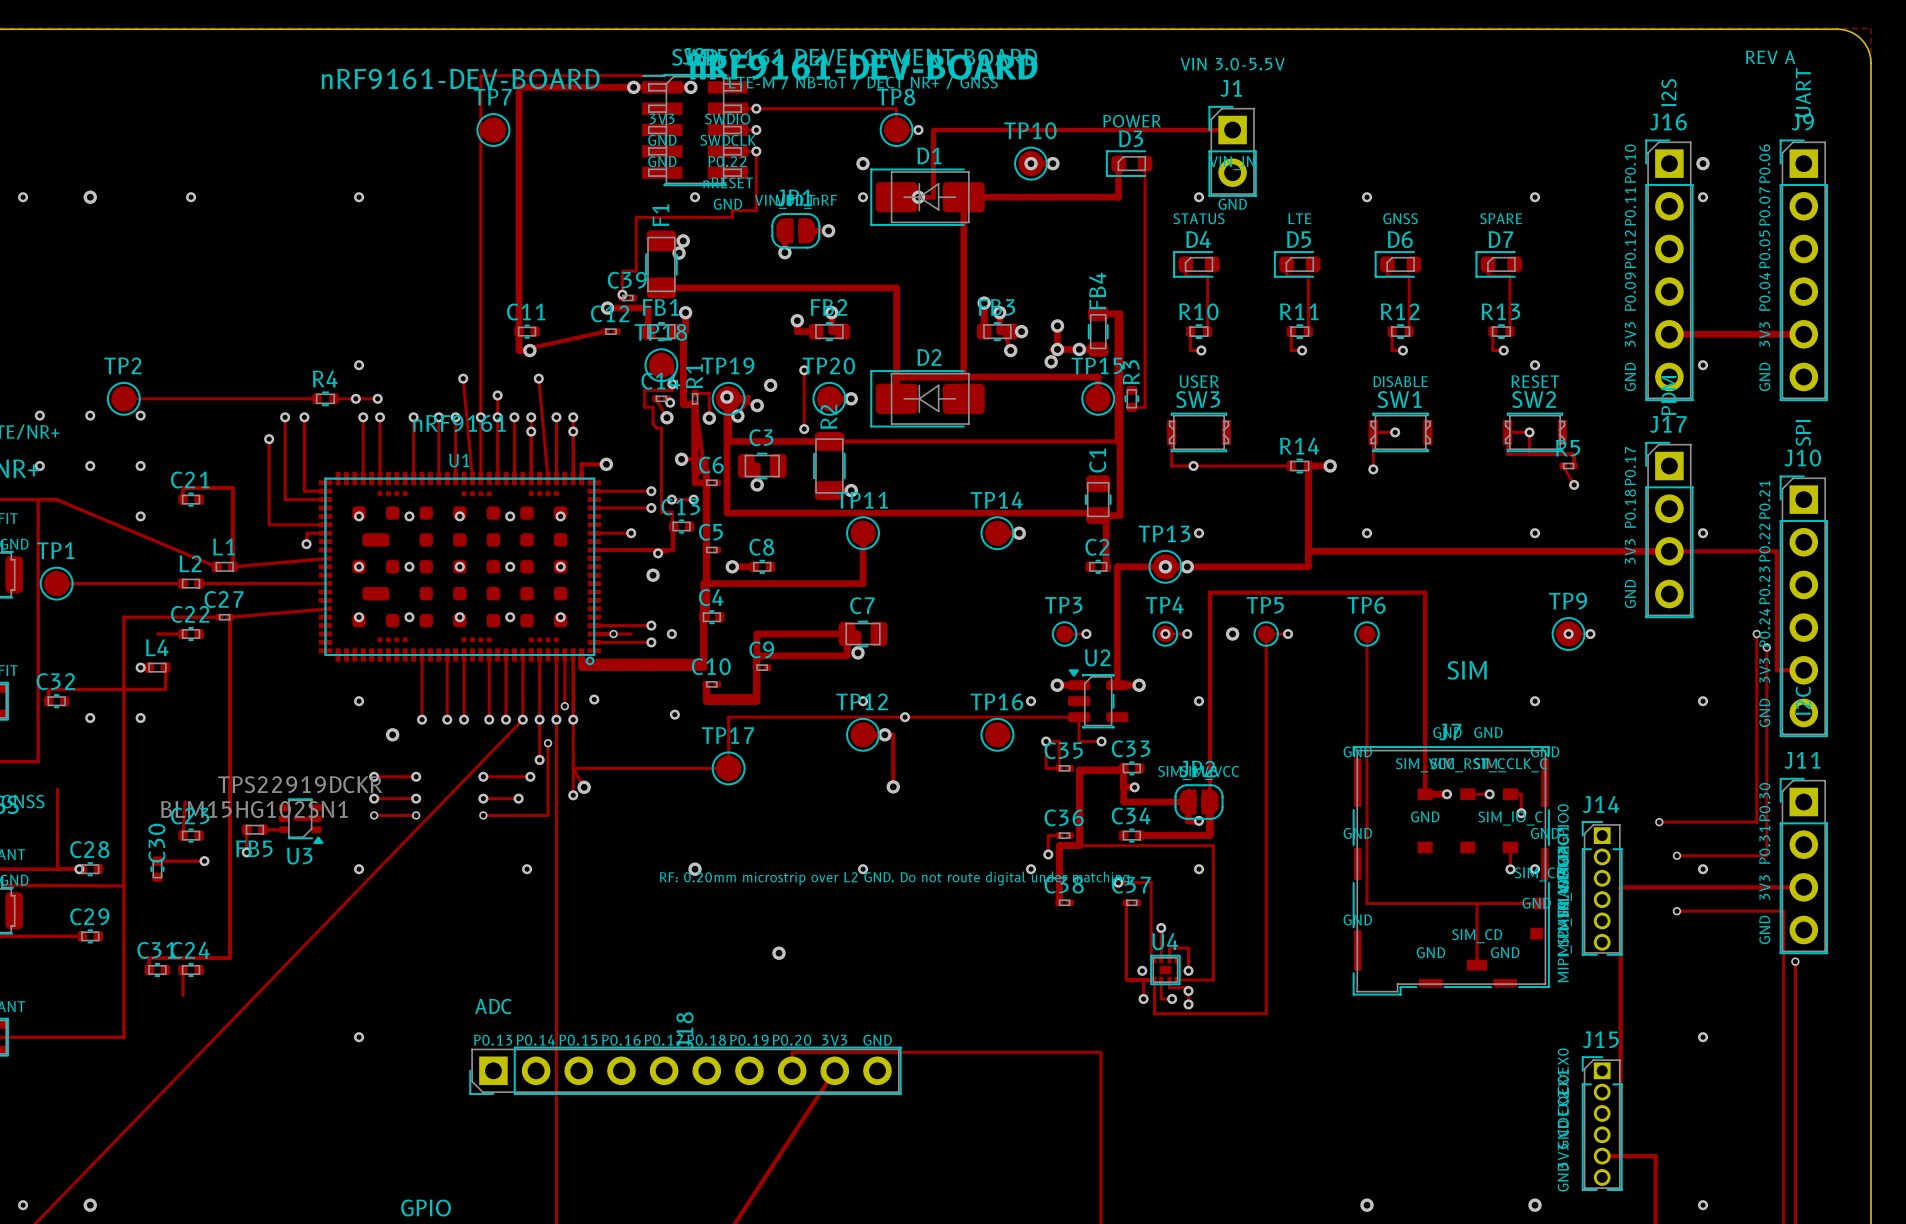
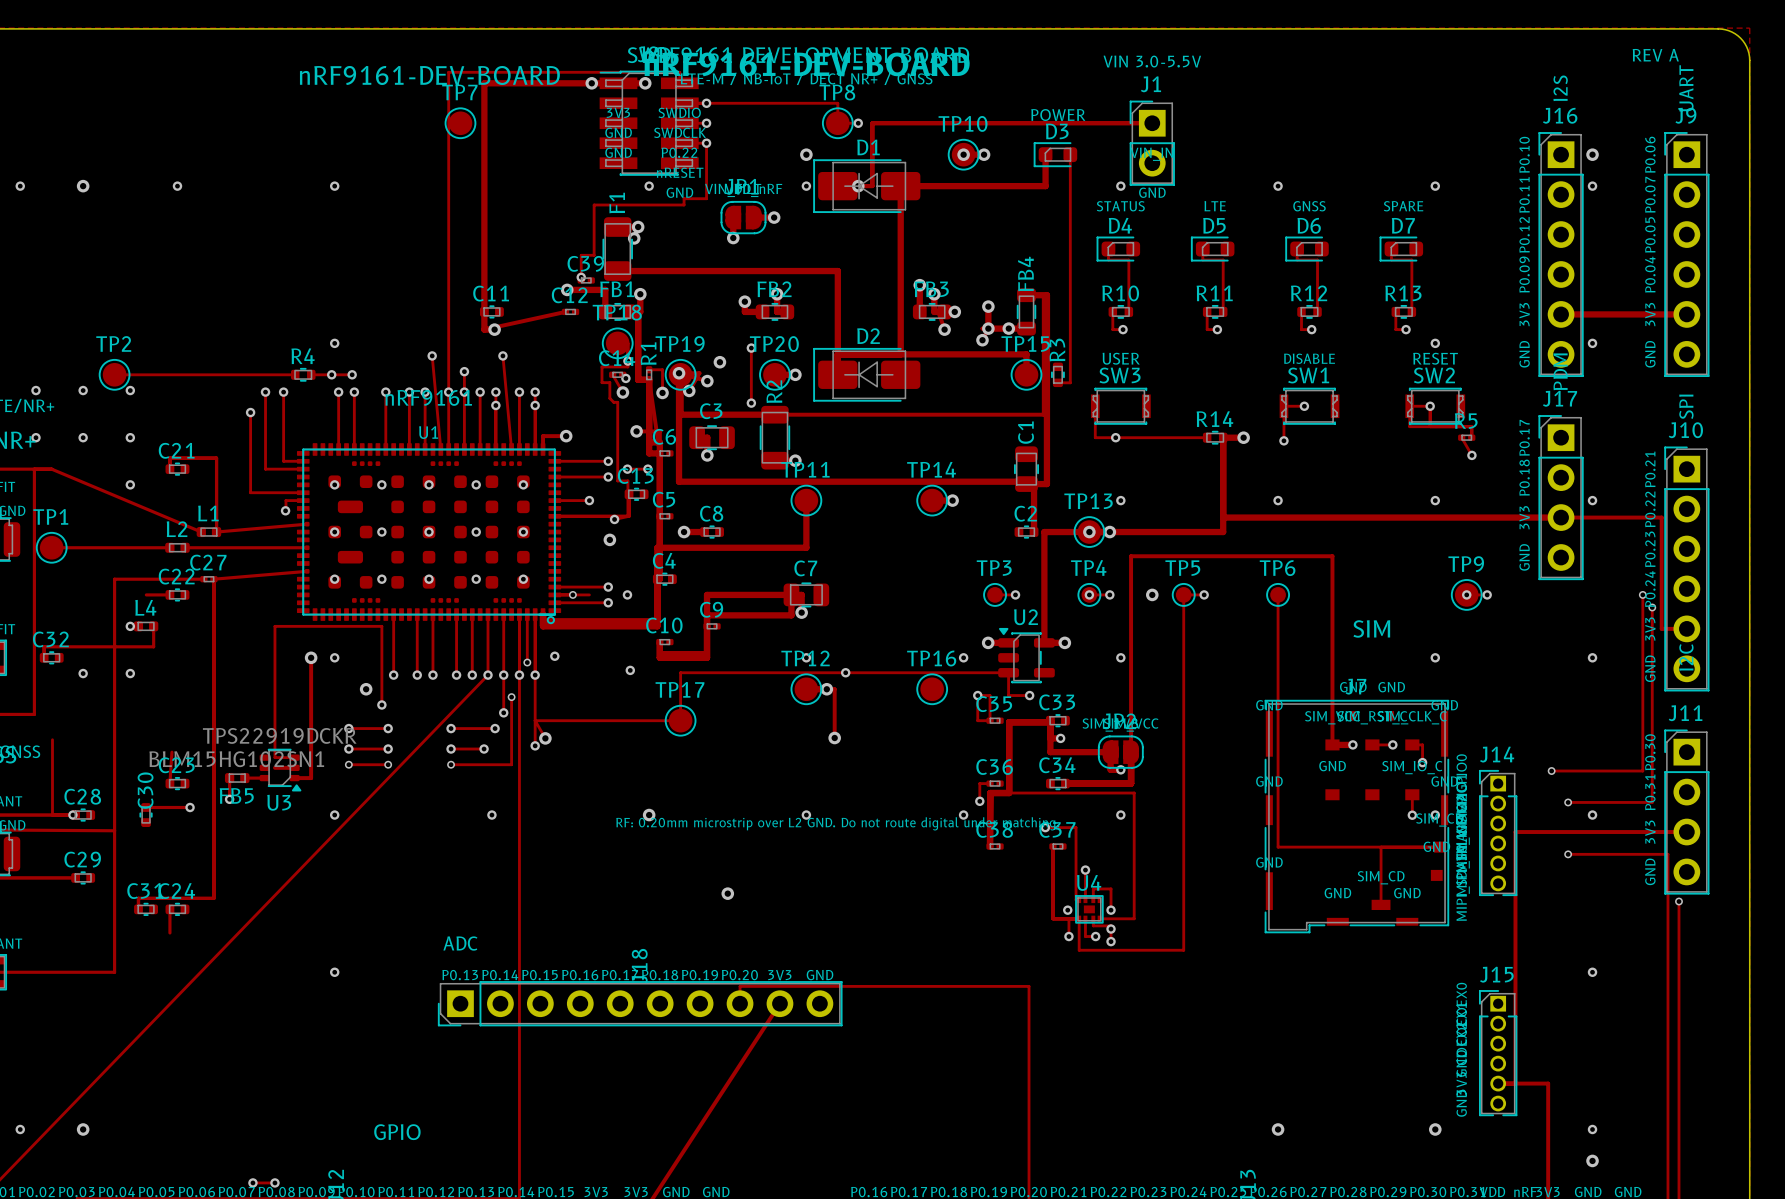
track: none -> (311, 657) (311, 778) (294, 778)
via: none -> (311, 657)
track: none -> (381, 704) (381, 626) (274, 626) (274, 757) (294, 757)
via: none -> (381, 704)

